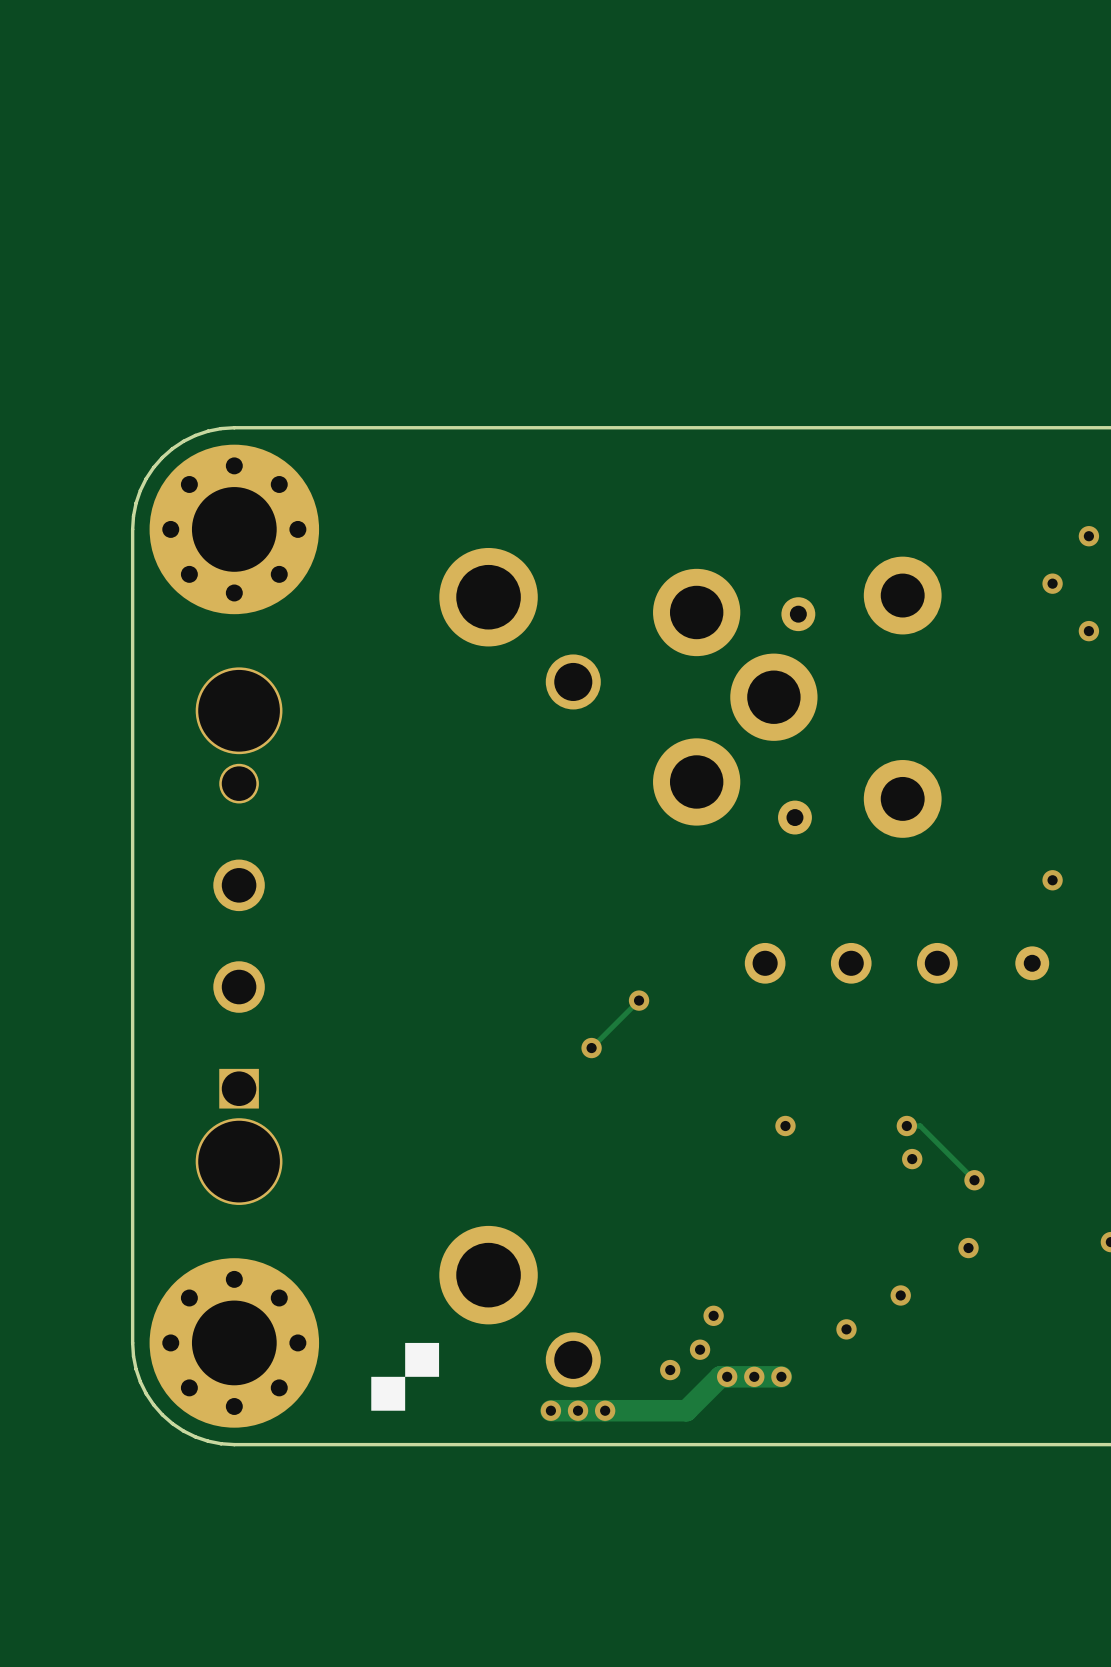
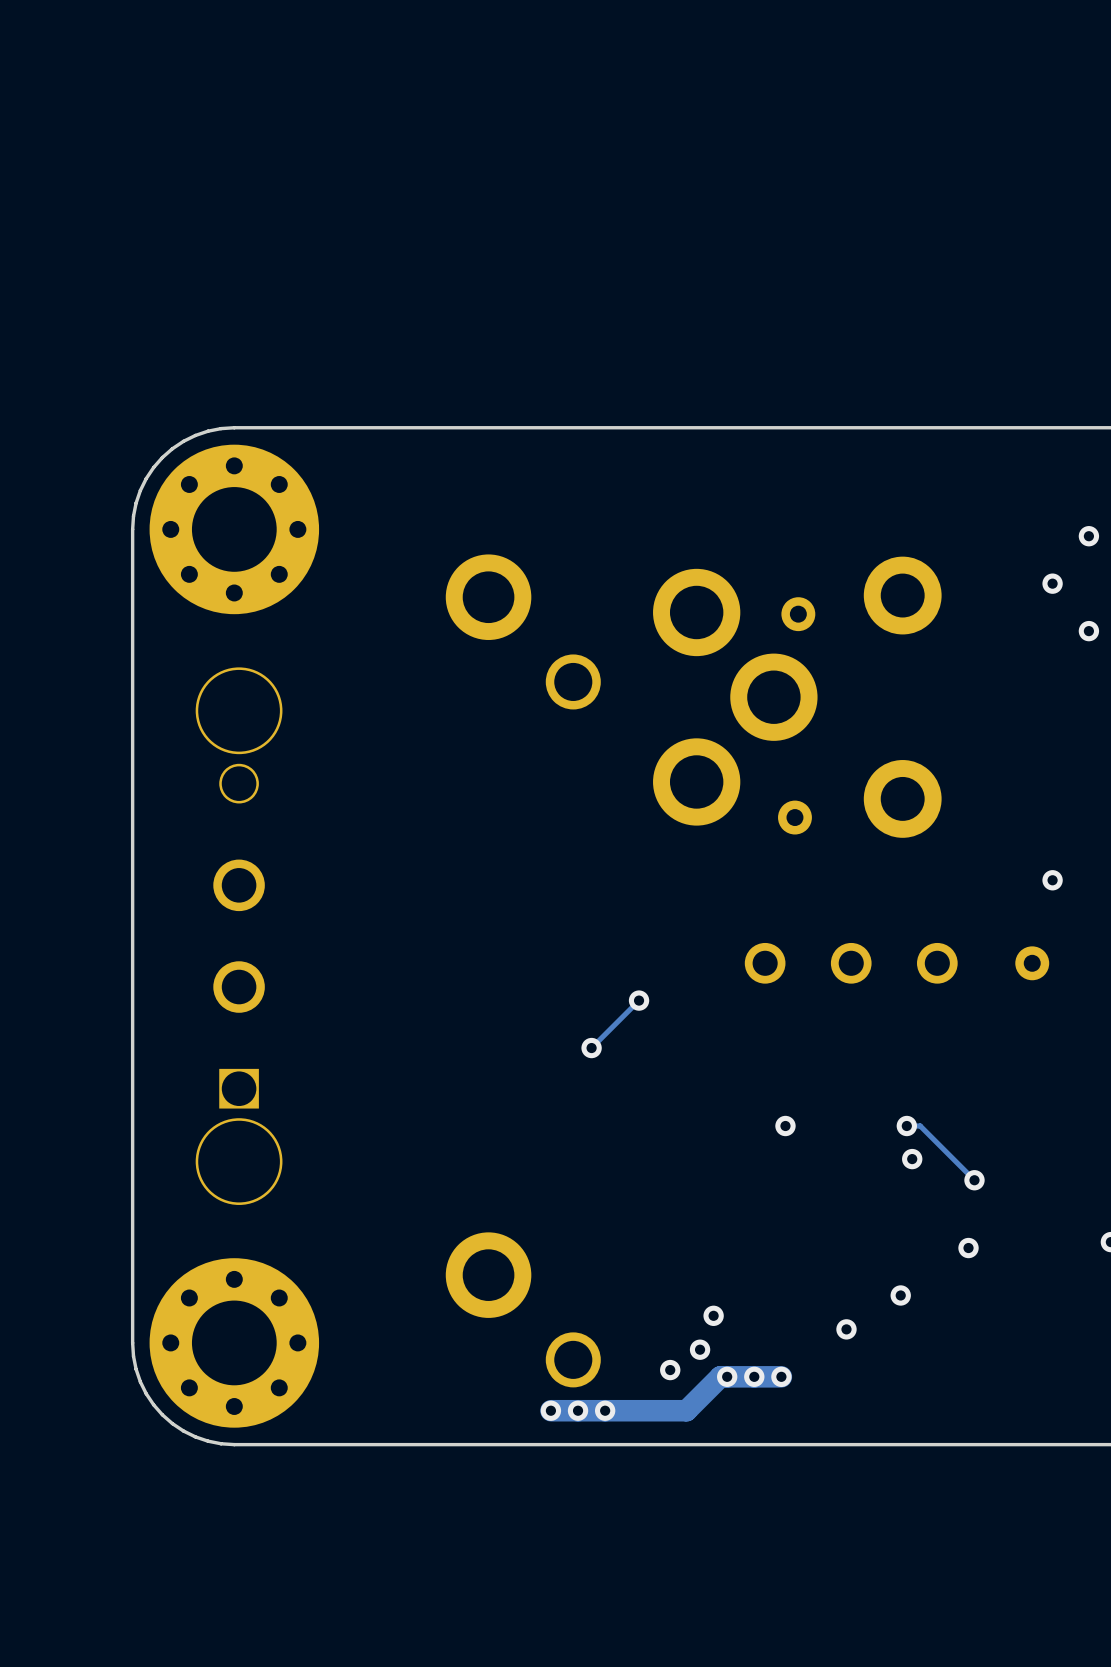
part footprint: [439, 547, 601, 710] -> [445, 554, 601, 710]
part footprint: [439, 1225, 601, 1388] -> [445, 1232, 601, 1388]
drawing: [371, 1342, 440, 1411] -> none

